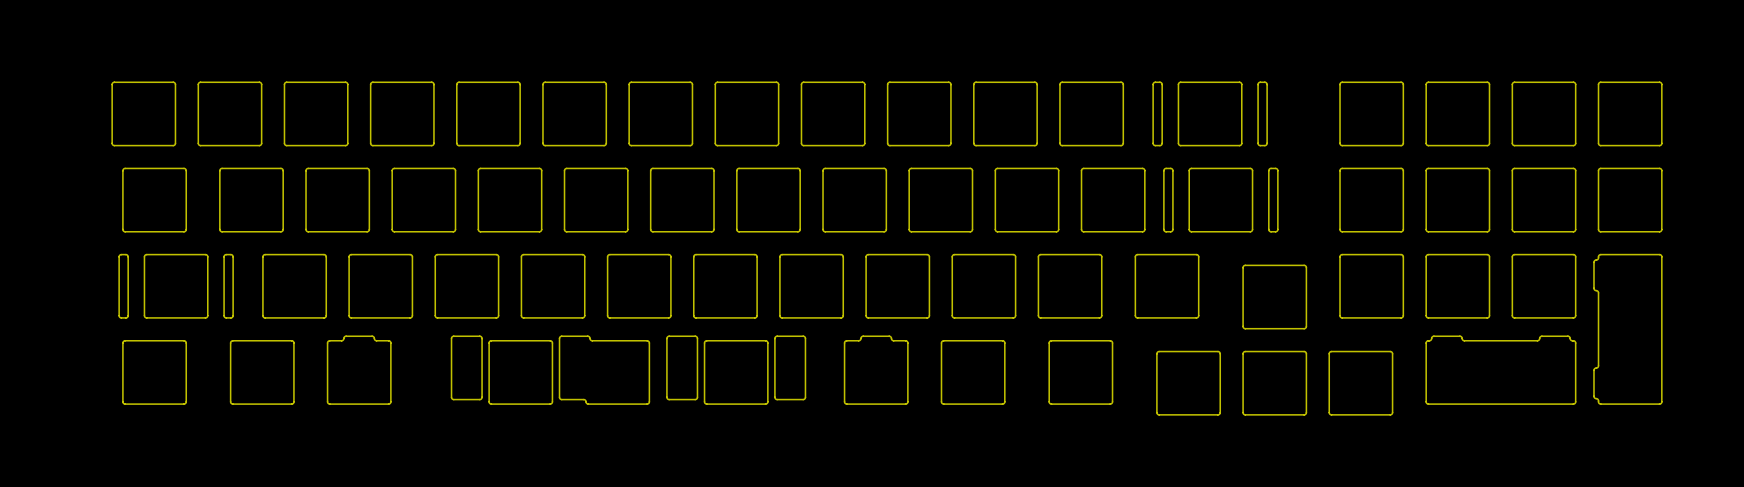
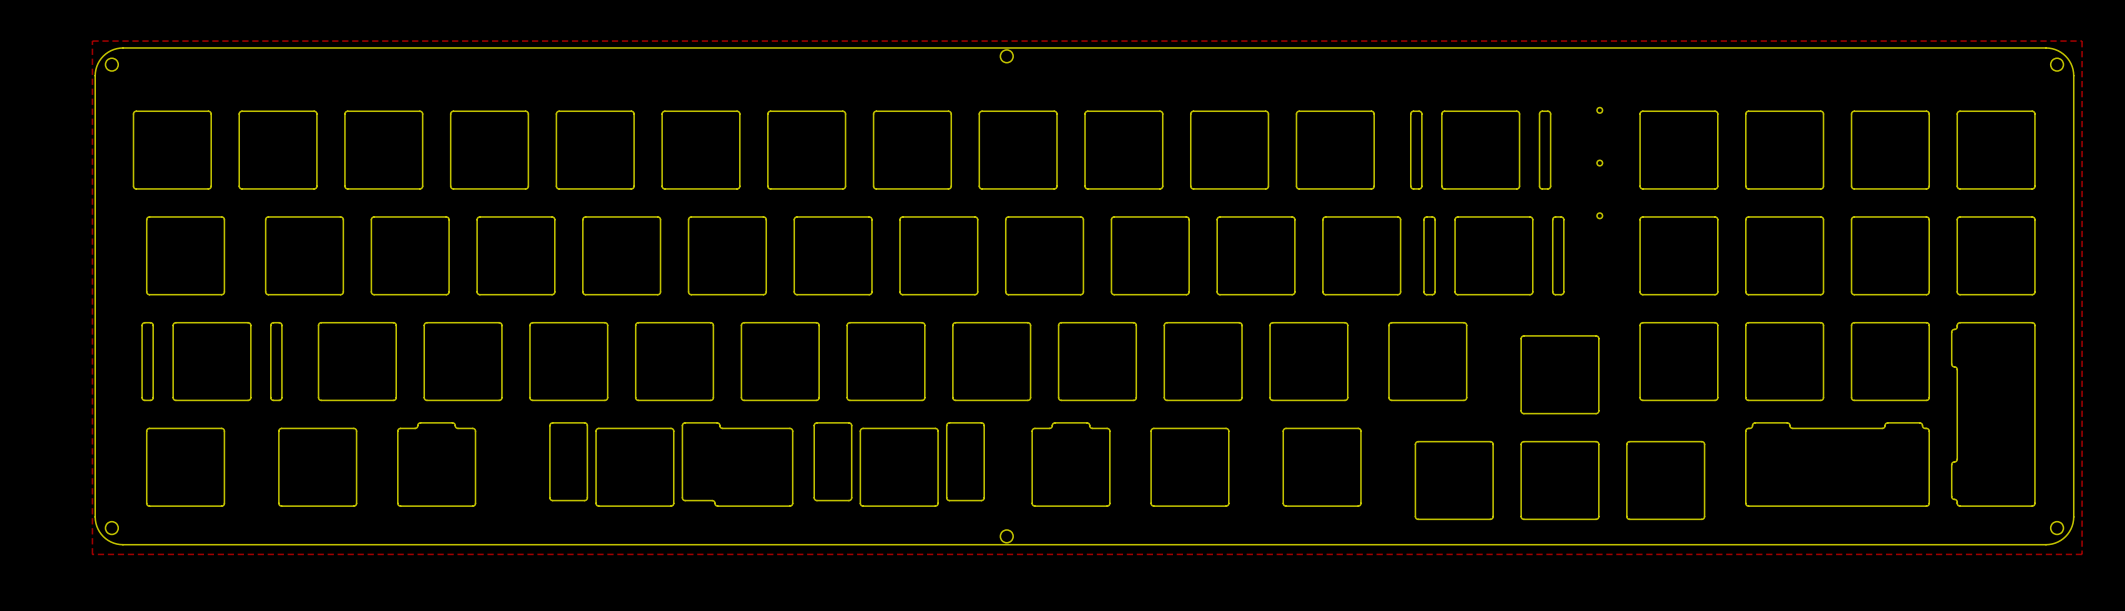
zone outline: none -> (92, 41) (92, 554) (2082, 554) (2082, 41) (92, 41)
board edge: none -> (122, 47) (2052, 48) (2060, 52) (2067, 58) (2072, 66) (2073, 75) (2073, 523) (2069, 531) (2063, 538) (2055, 543) (2045, 544) (116, 544) (108, 540) (101, 534) (96, 526) (95, 516) (95, 75) (97, 63) (103, 56) (113, 49) (122, 47)
round board edge: none -> [999, 49, 1014, 64]
round board edge: none -> [105, 57, 119, 72]
round board edge: none -> [2050, 57, 2064, 72]
round board edge: none -> [1596, 107, 1604, 114]
round board edge: none -> [1596, 159, 1604, 167]
round board edge: none -> [1596, 212, 1604, 220]
round board edge: none -> [105, 521, 119, 535]
round board edge: none -> [2050, 521, 2064, 535]
round board edge: none -> [999, 529, 1014, 544]

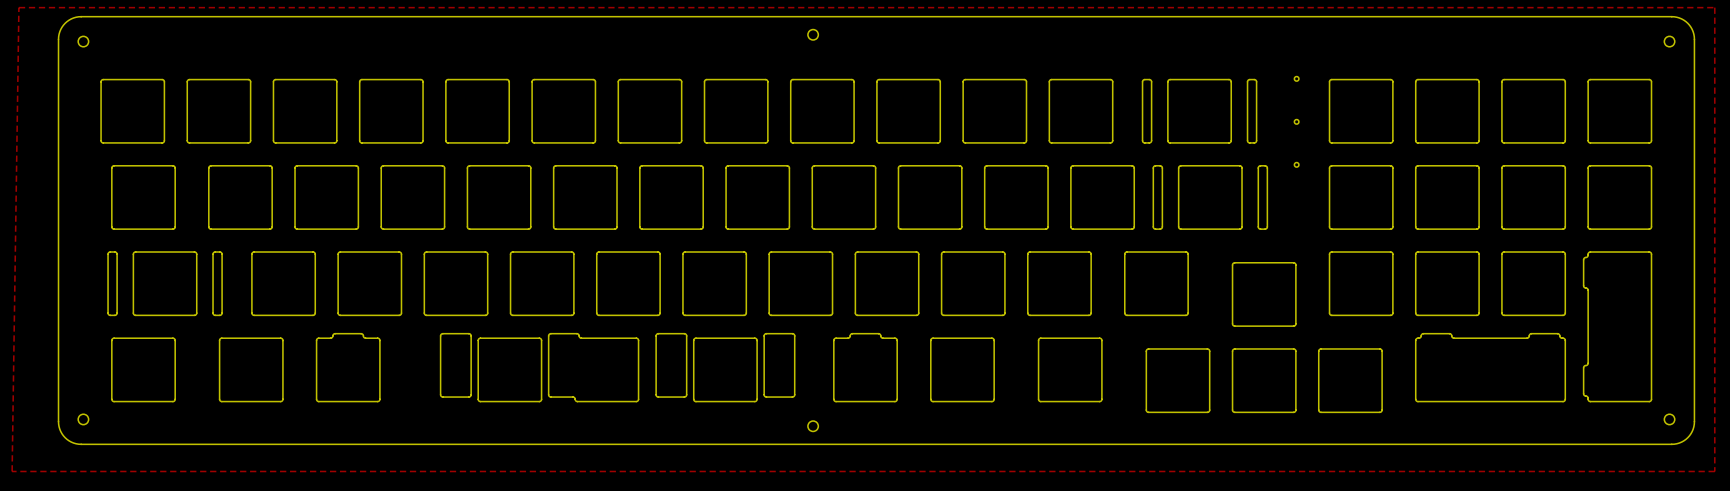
zone outline: (92, 41) (92, 554) (2082, 554) (2082, 41) (92, 41) -> (18, 7) (12, 471) (1714, 471) (1714, 7) (18, 7)
board edge: (122, 47) (2052, 48) (2060, 52) (2067, 58) (2072, 66) (2073, 75) (2073, 523) (2069, 531) (2063, 538) (2055, 543) (2045, 544) (116, 544) (108, 540) (101, 534) (96, 526) (95, 516) (95, 75) (97, 63) (103, 56) (113, 49) (122, 47) -> (81, 16) (73, 17) (65, 23) (60, 29) (58, 39) (58, 421) (63, 435) (76, 443) (1671, 444) (1685, 439) (1693, 426) (1694, 39) (1689, 25) (1676, 17) (81, 16)

